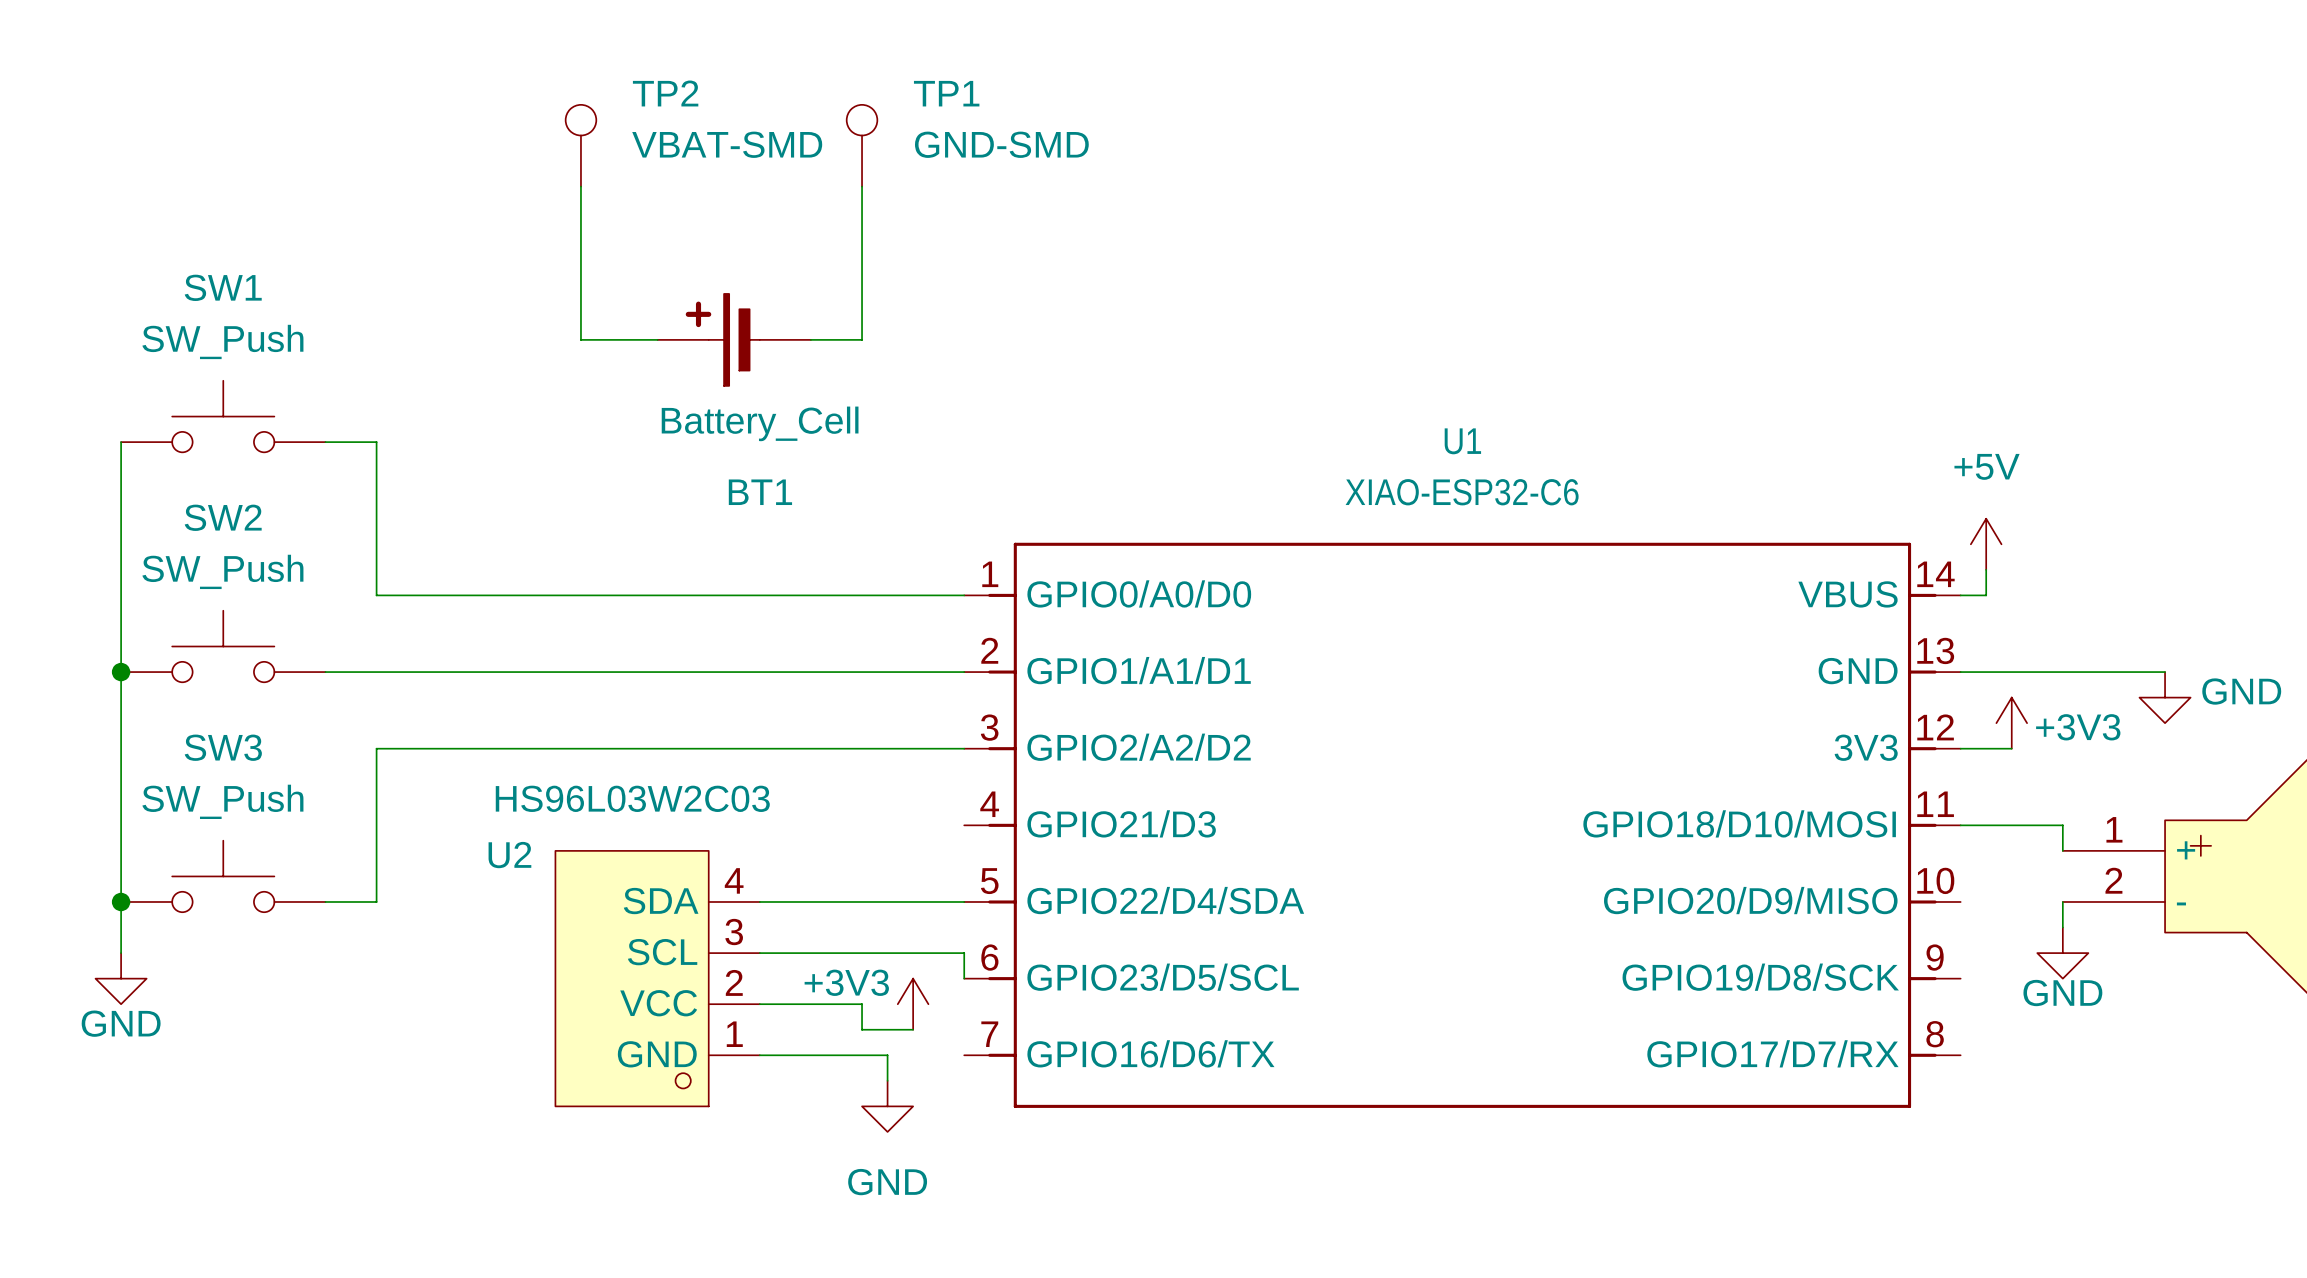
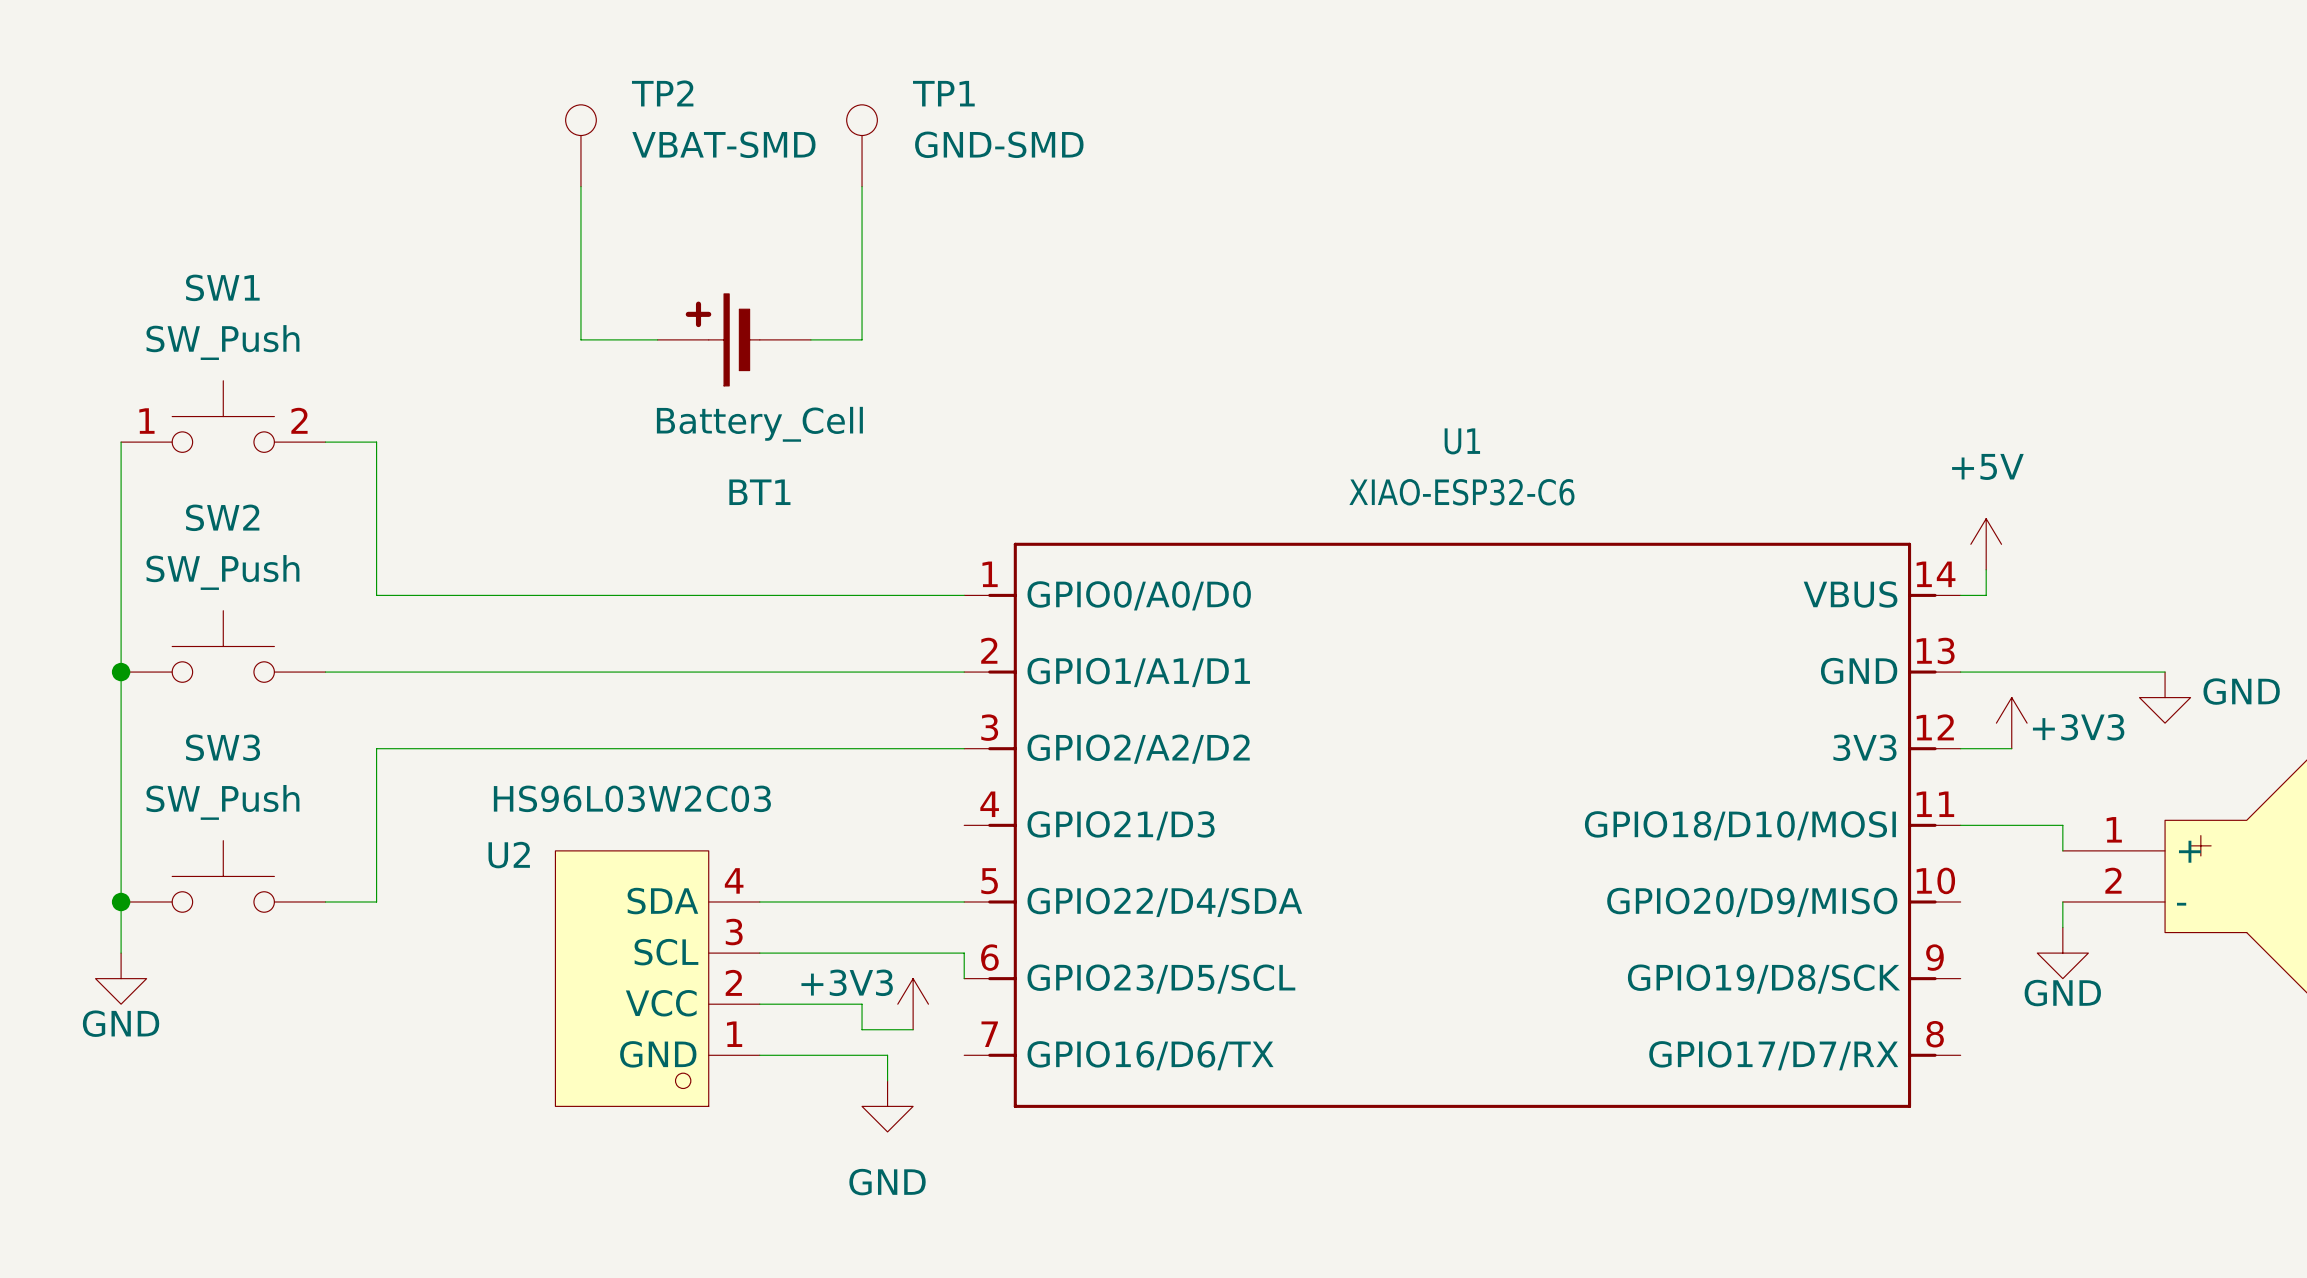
SW1 pin number: none -> 2 (299, 420)
SW1 pin number: none -> 1 (146, 421)

